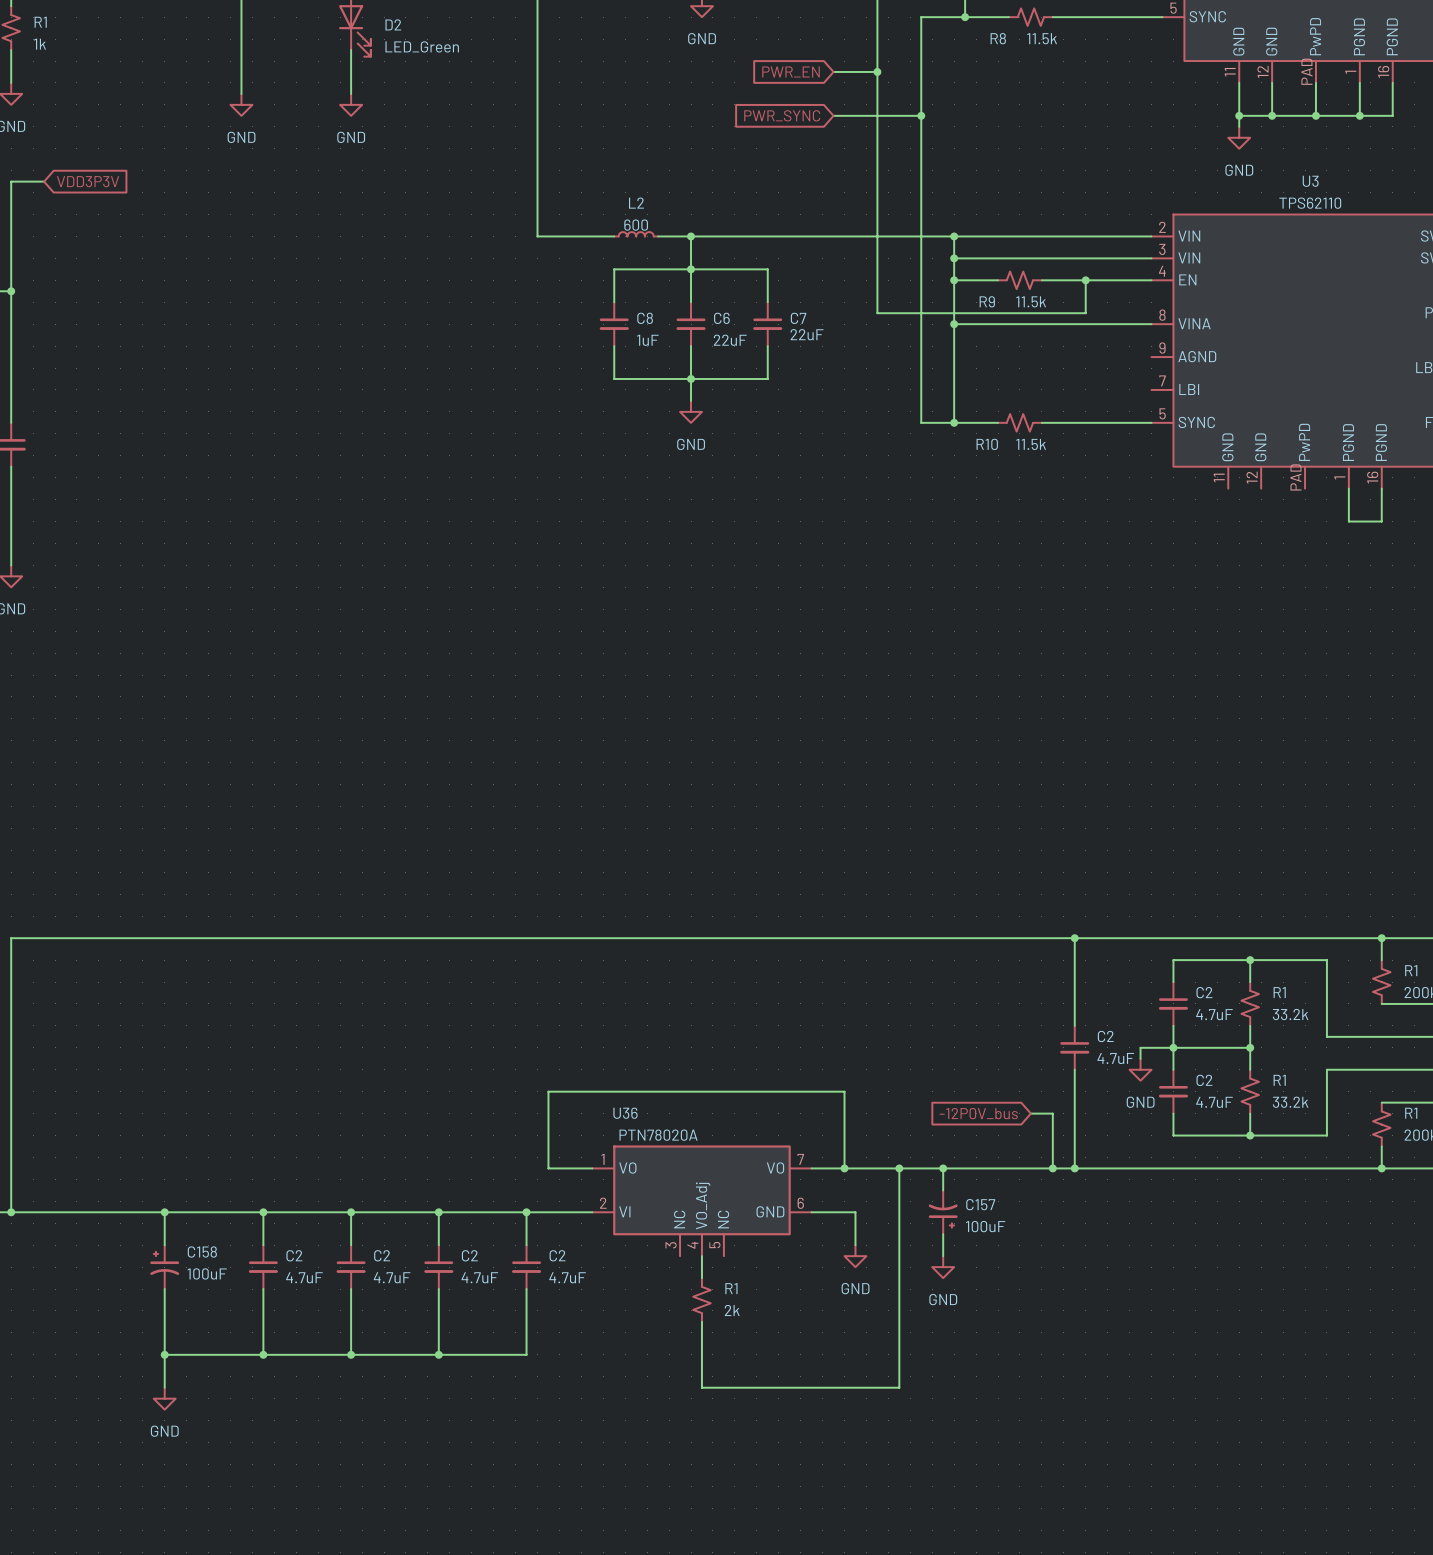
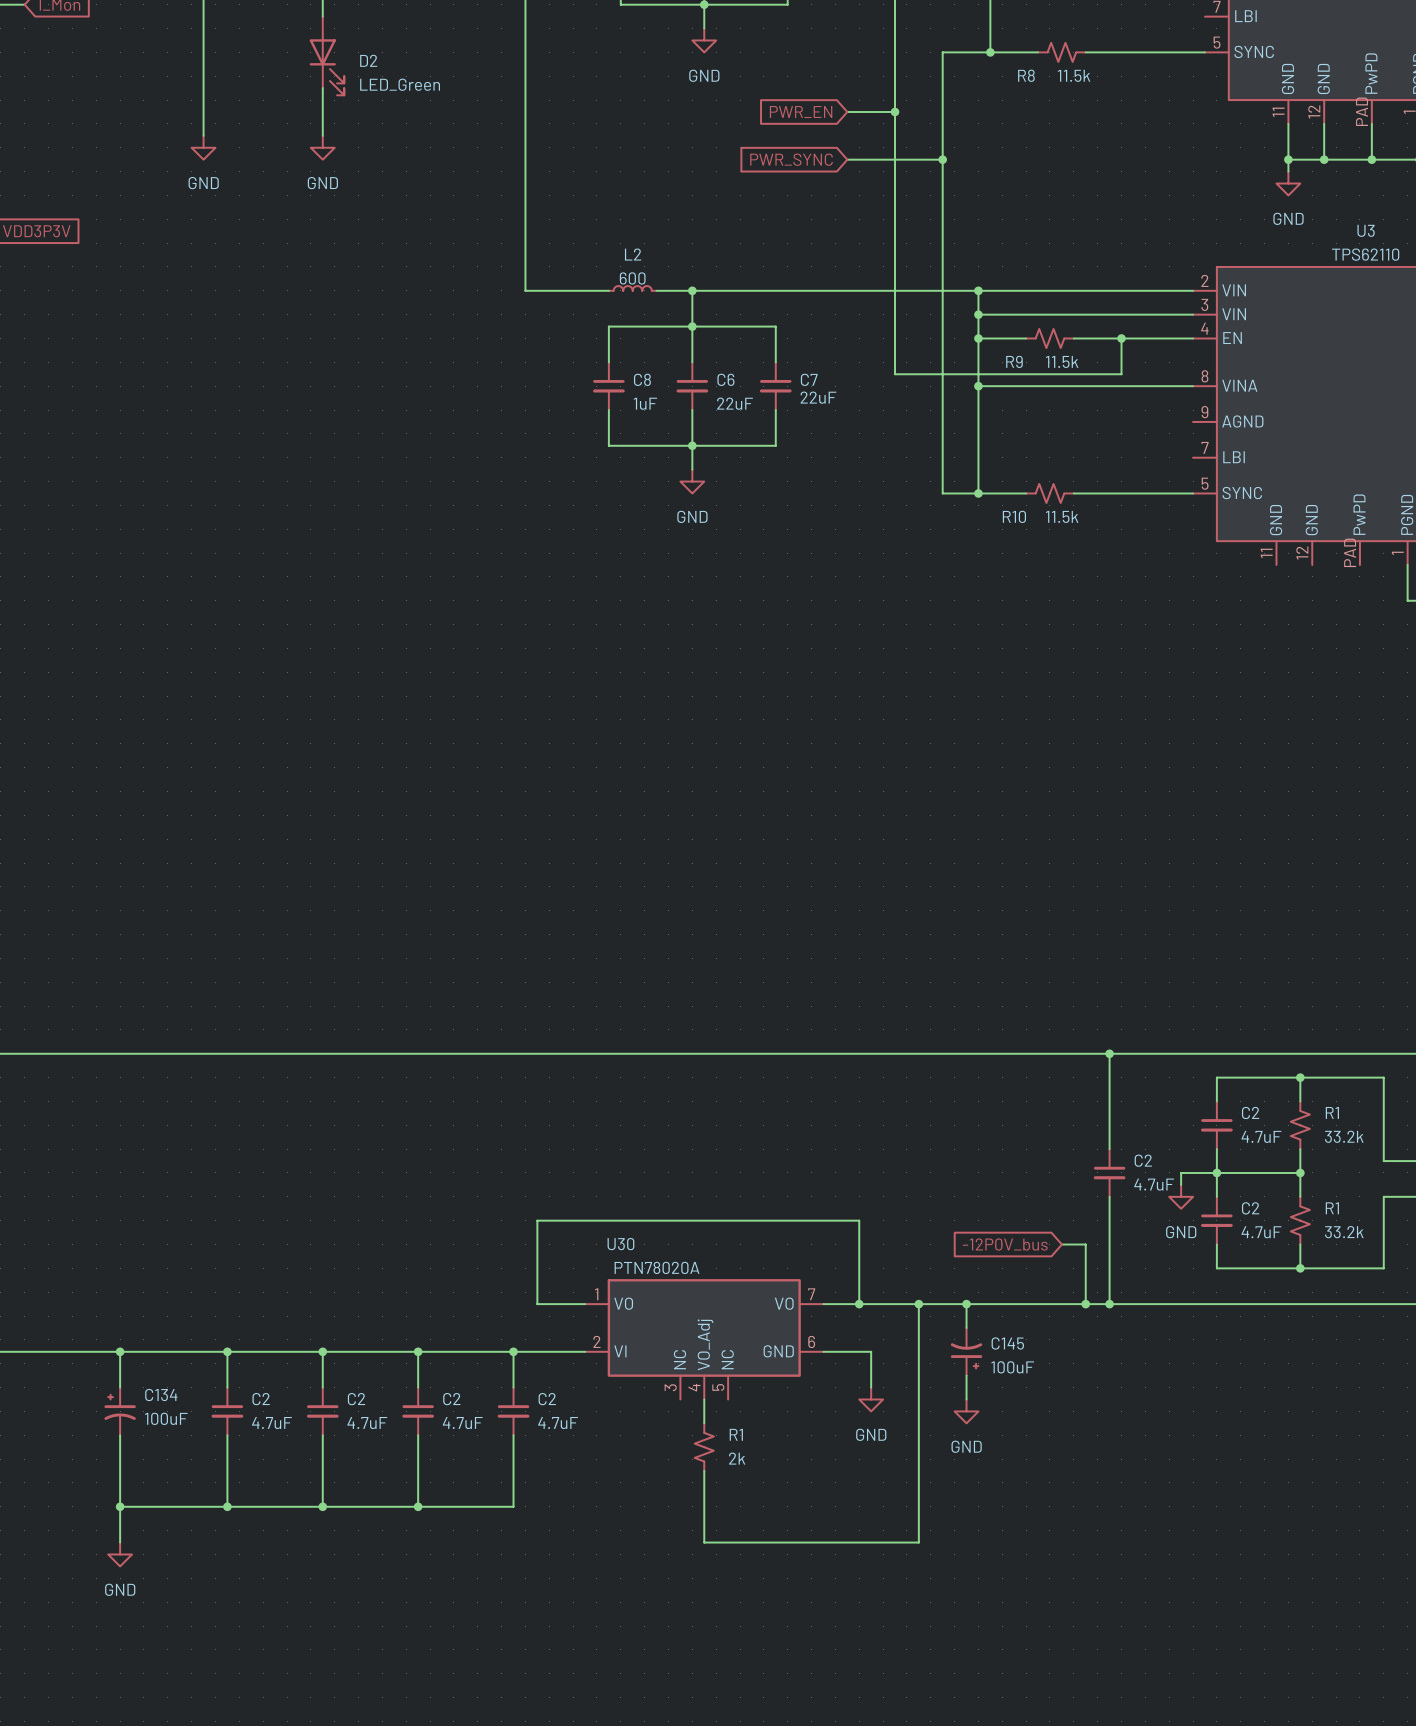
U36 name: U36 (625, 1113) -> U30 (620, 1244)
C157 name: C157 (980, 1204) -> C145 (1007, 1343)
C158 name: C158 (202, 1252) -> C134 (161, 1395)

